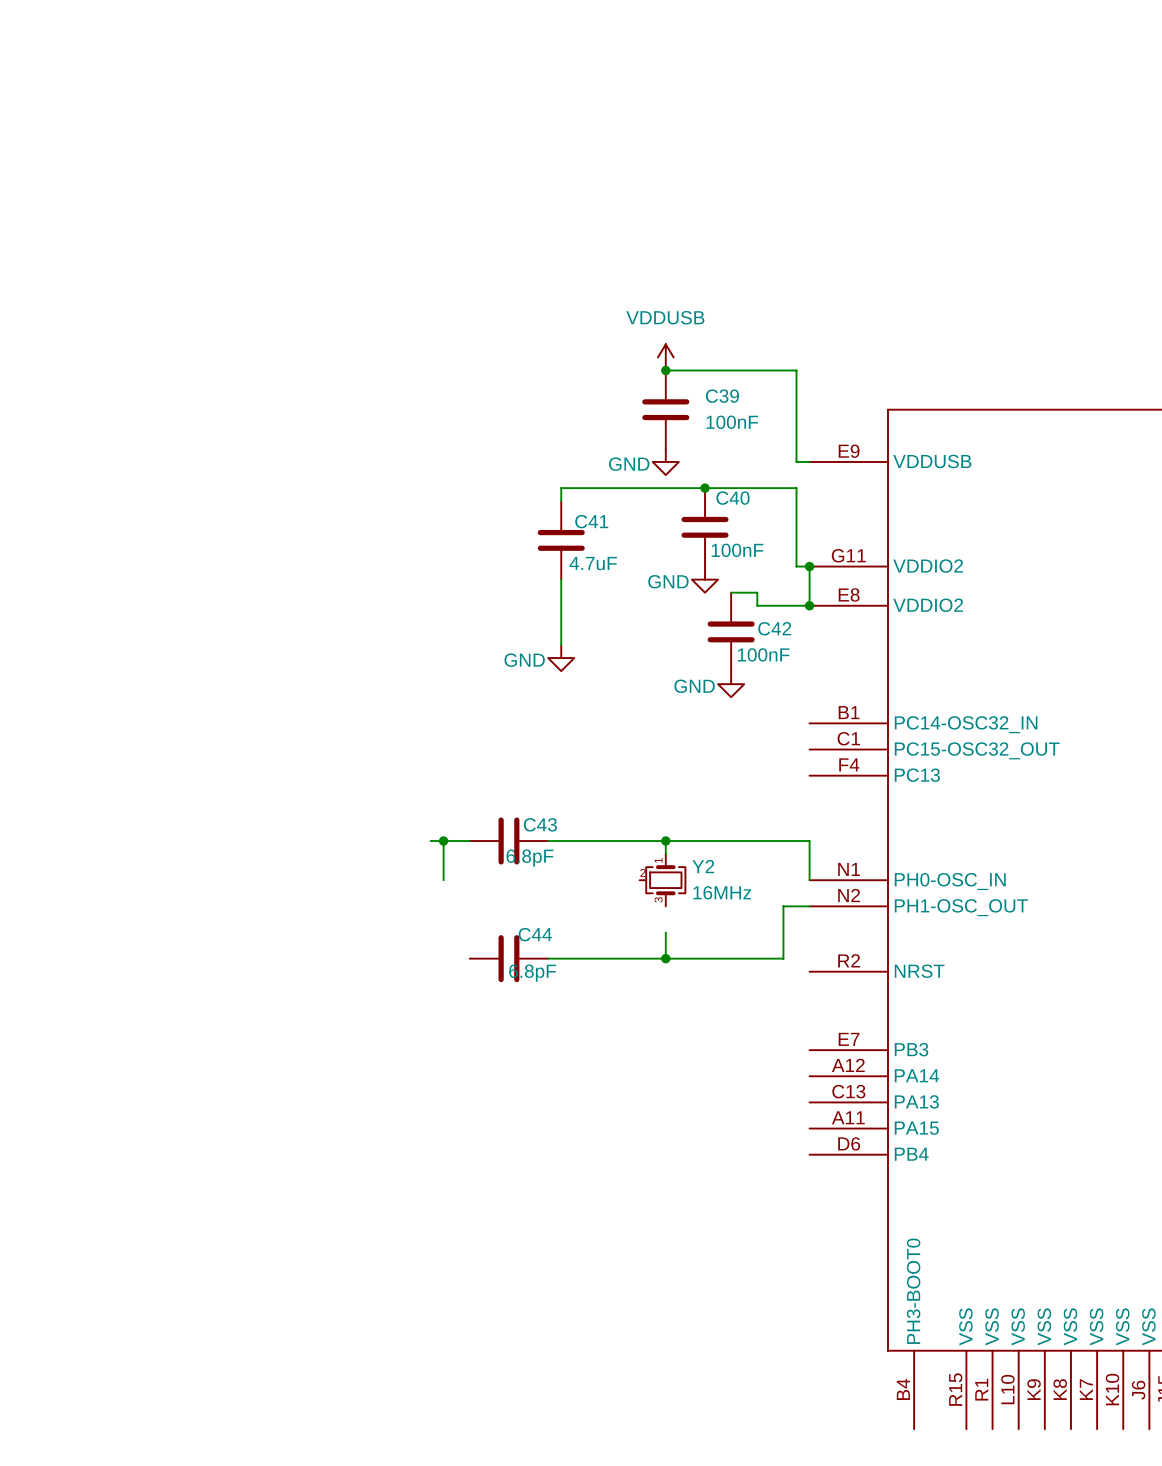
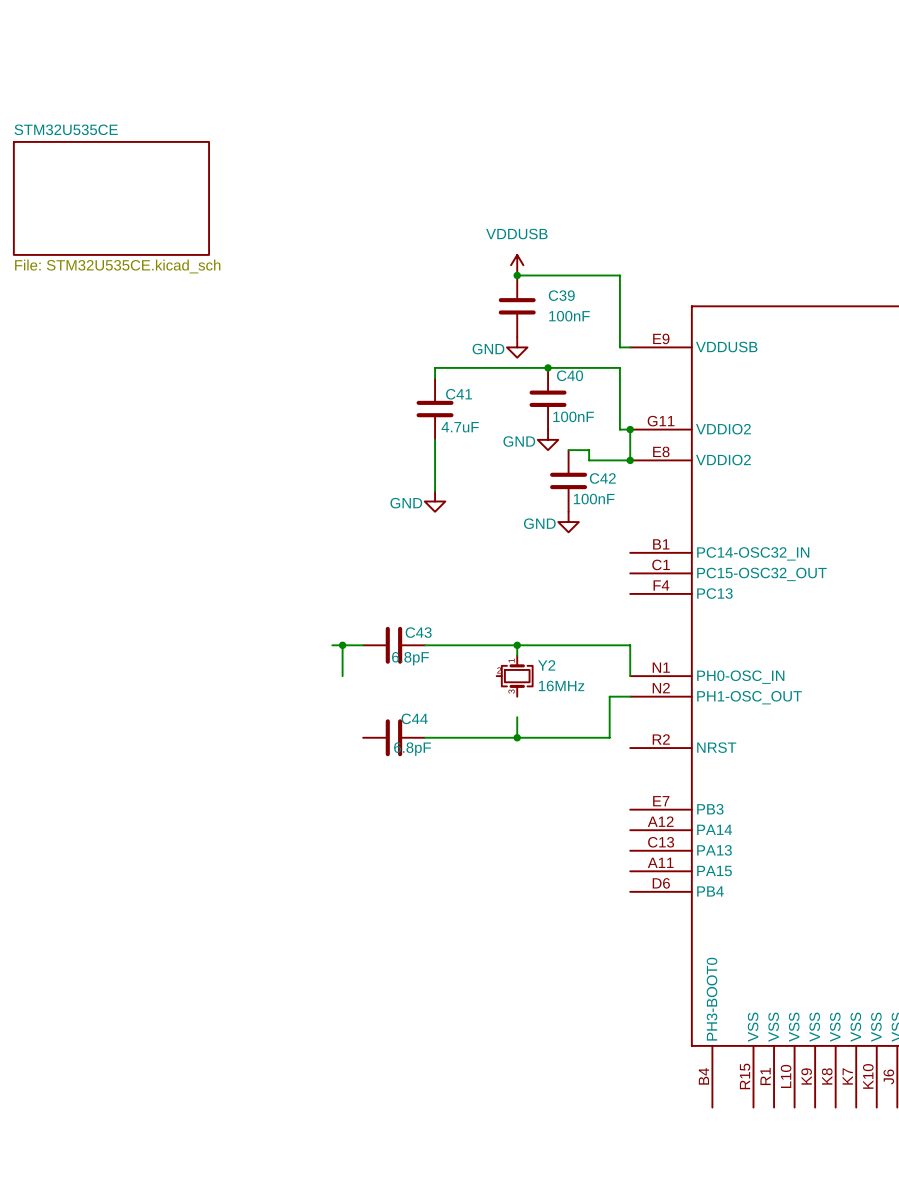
sheet STM32U535CE: none -> File: STM32U535CE.kicad_sch (111, 198)

